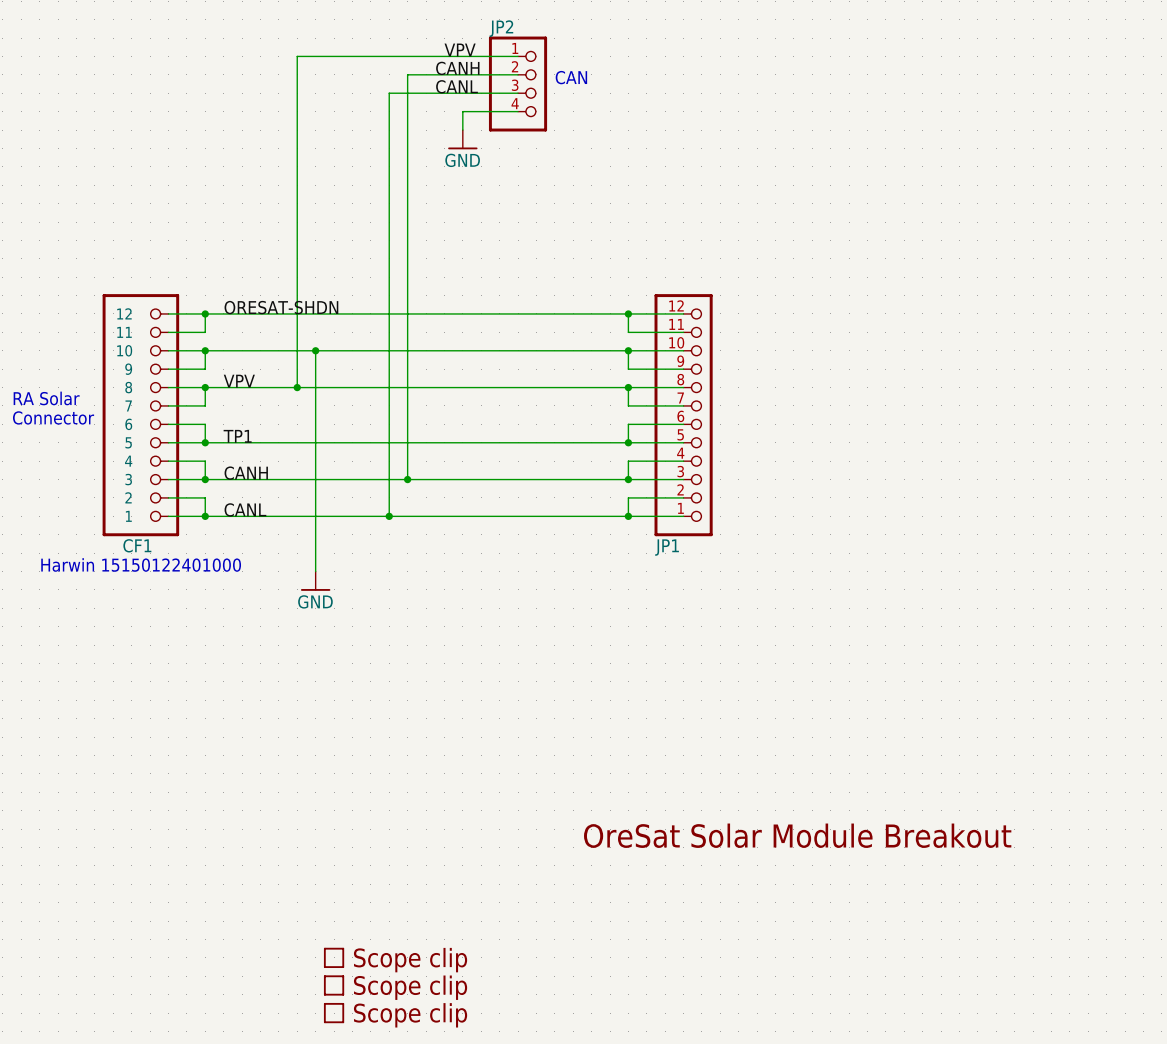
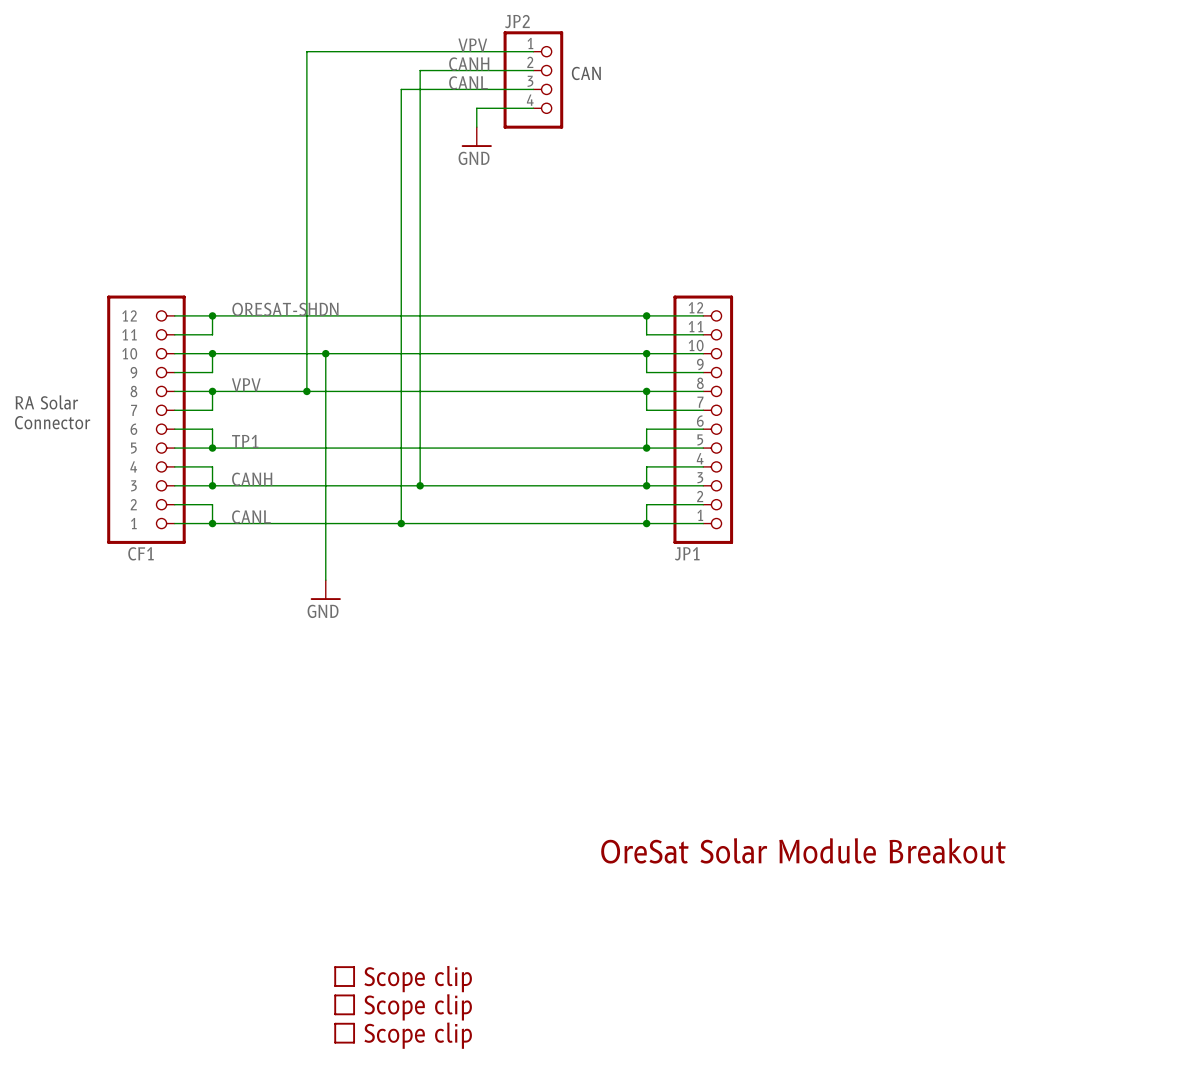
text: Harwin 15150122401000 (141, 564) -> none

